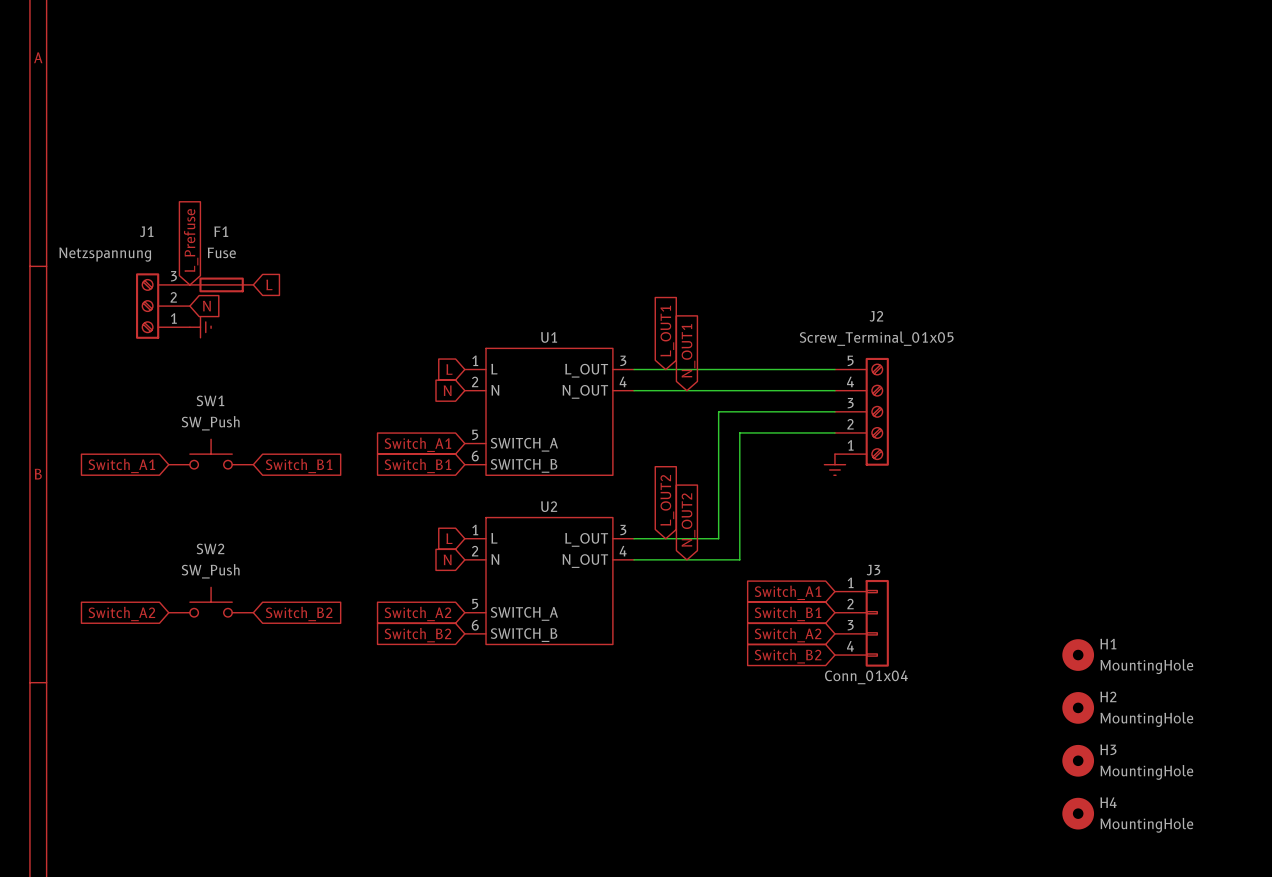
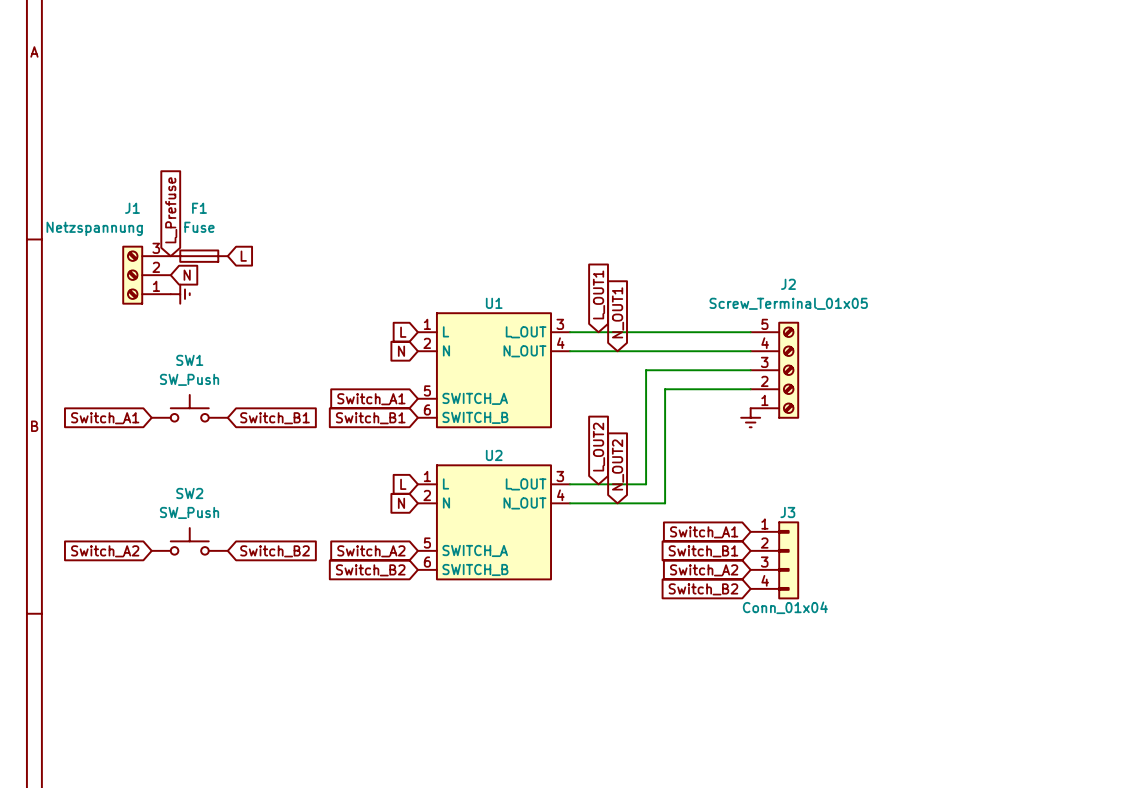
H1: MountingHole (1078, 655) -> none
H2: MountingHole (1078, 707) -> none
H3: MountingHole (1078, 760) -> none
H4: MountingHole (1078, 813) -> none

